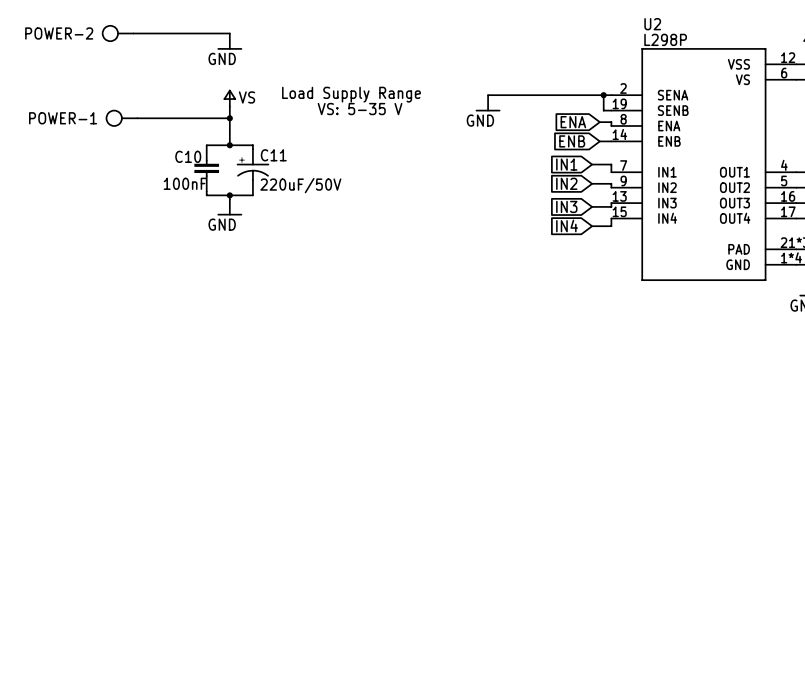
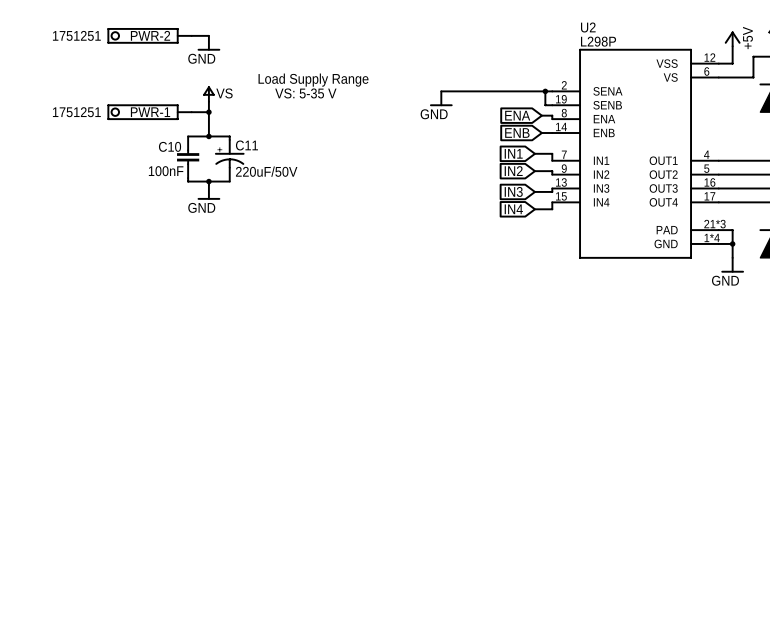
POWER-2: (117, 33) -> none
wire: (133, 33) (210, 33) -> none
PWR-2: none -> 1751251 (149, 35)
text: none -> Load Supply Range (313, 80)
text: Load Supply Range (351, 94) -> VS: 5-35 V (305, 93)
text: VS: 5-35 V (360, 109) -> none
POWER-1: (121, 118) -> none
wire: (137, 118) (210, 118) -> none
PWR-1: none -> 1751251 (149, 112)

